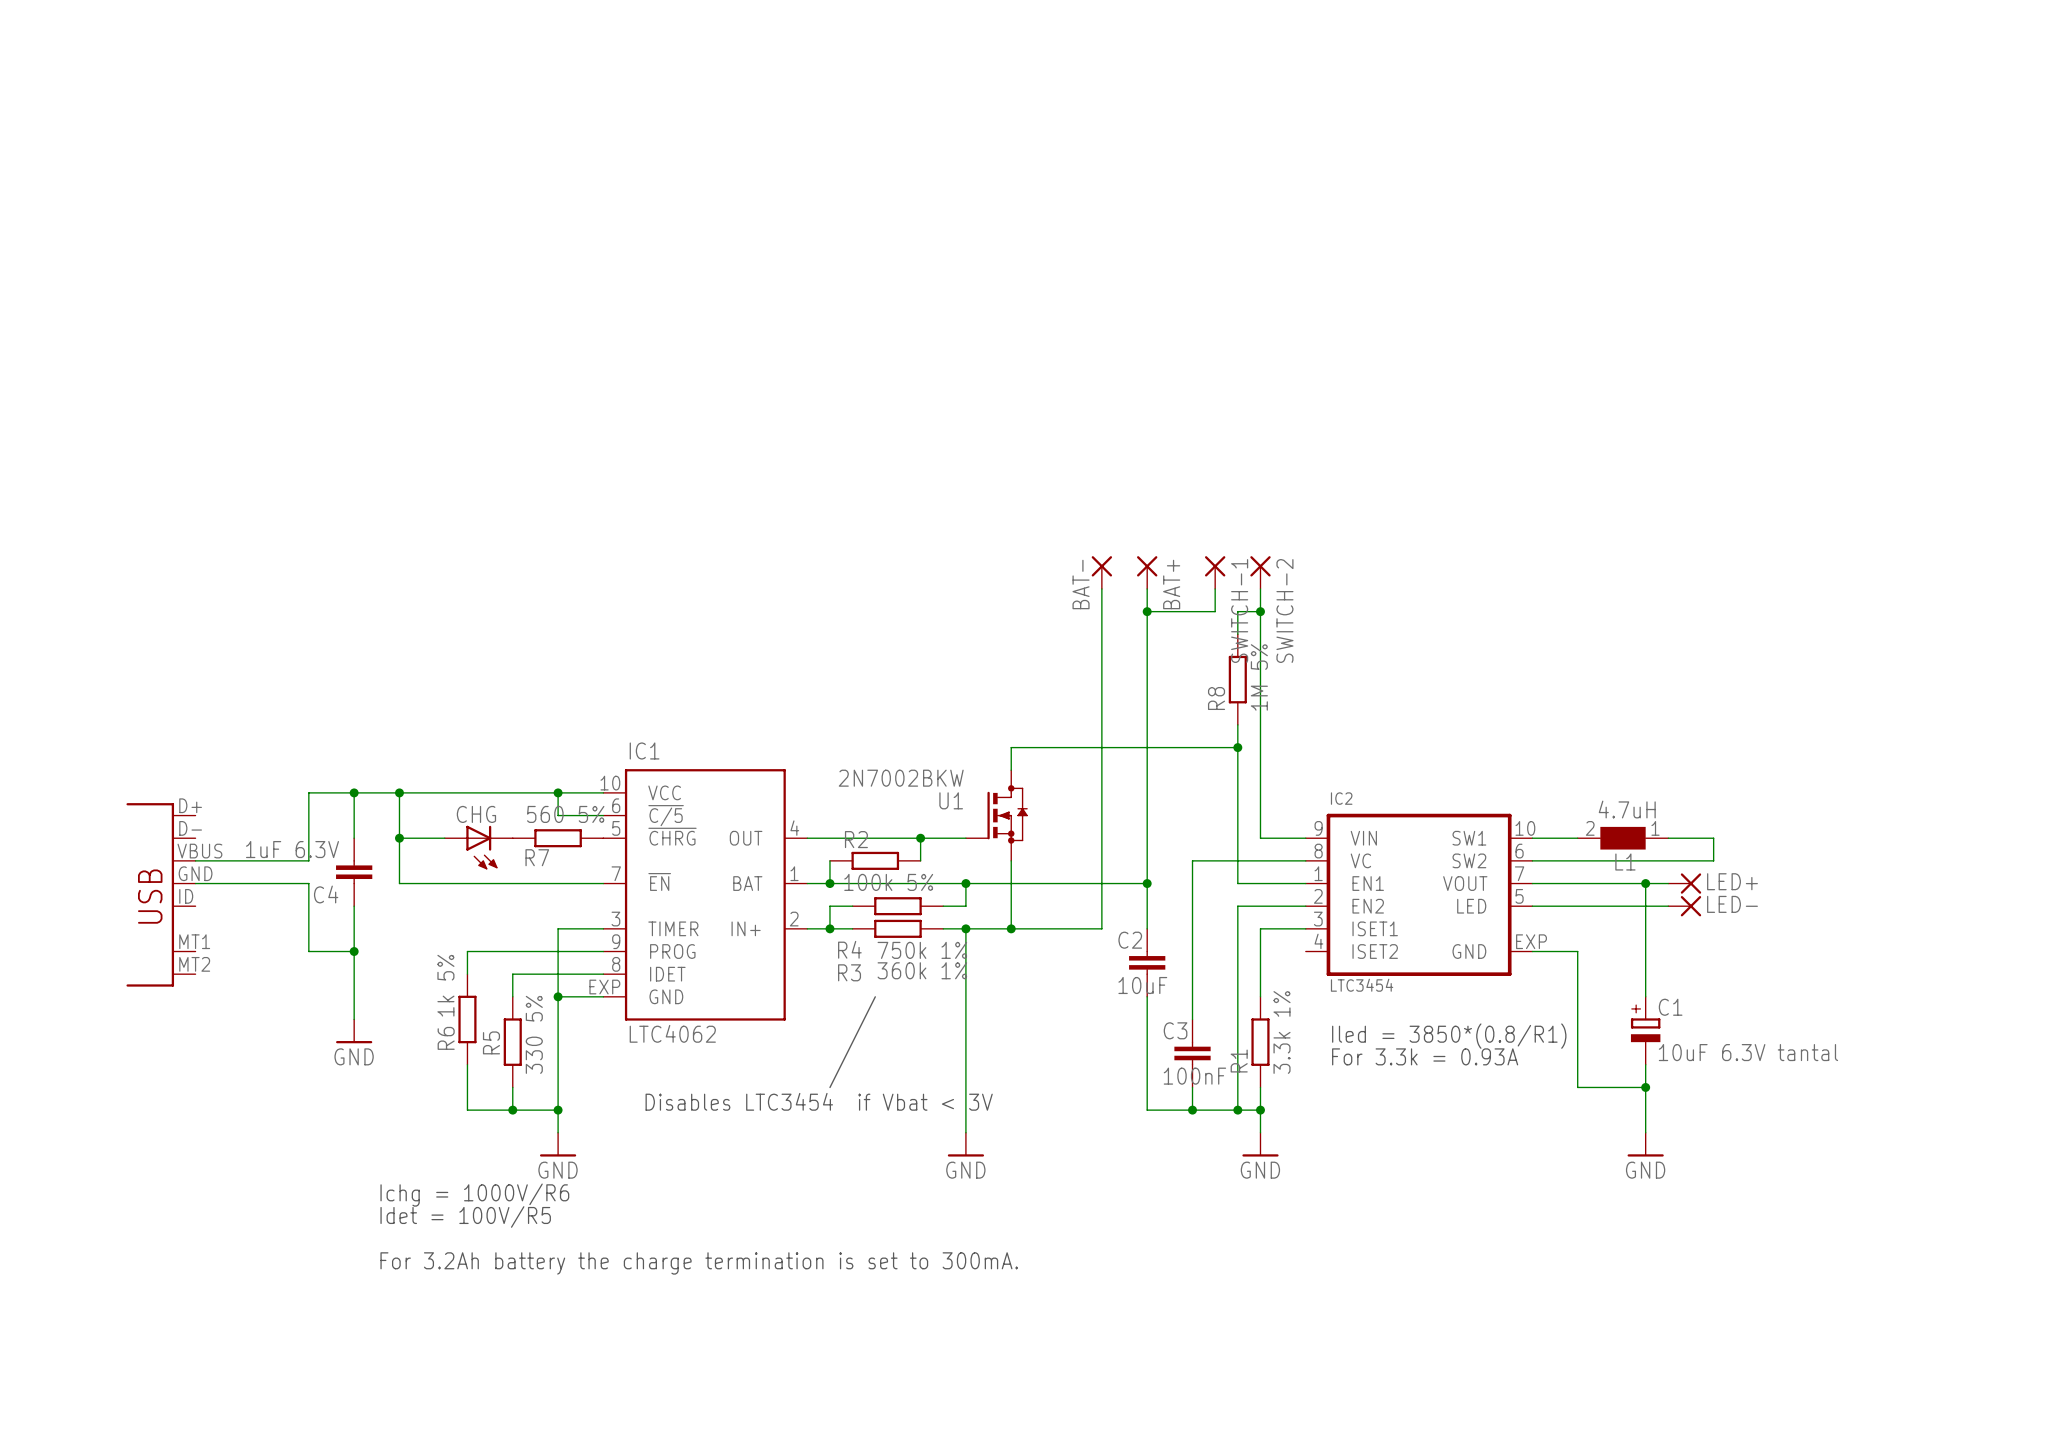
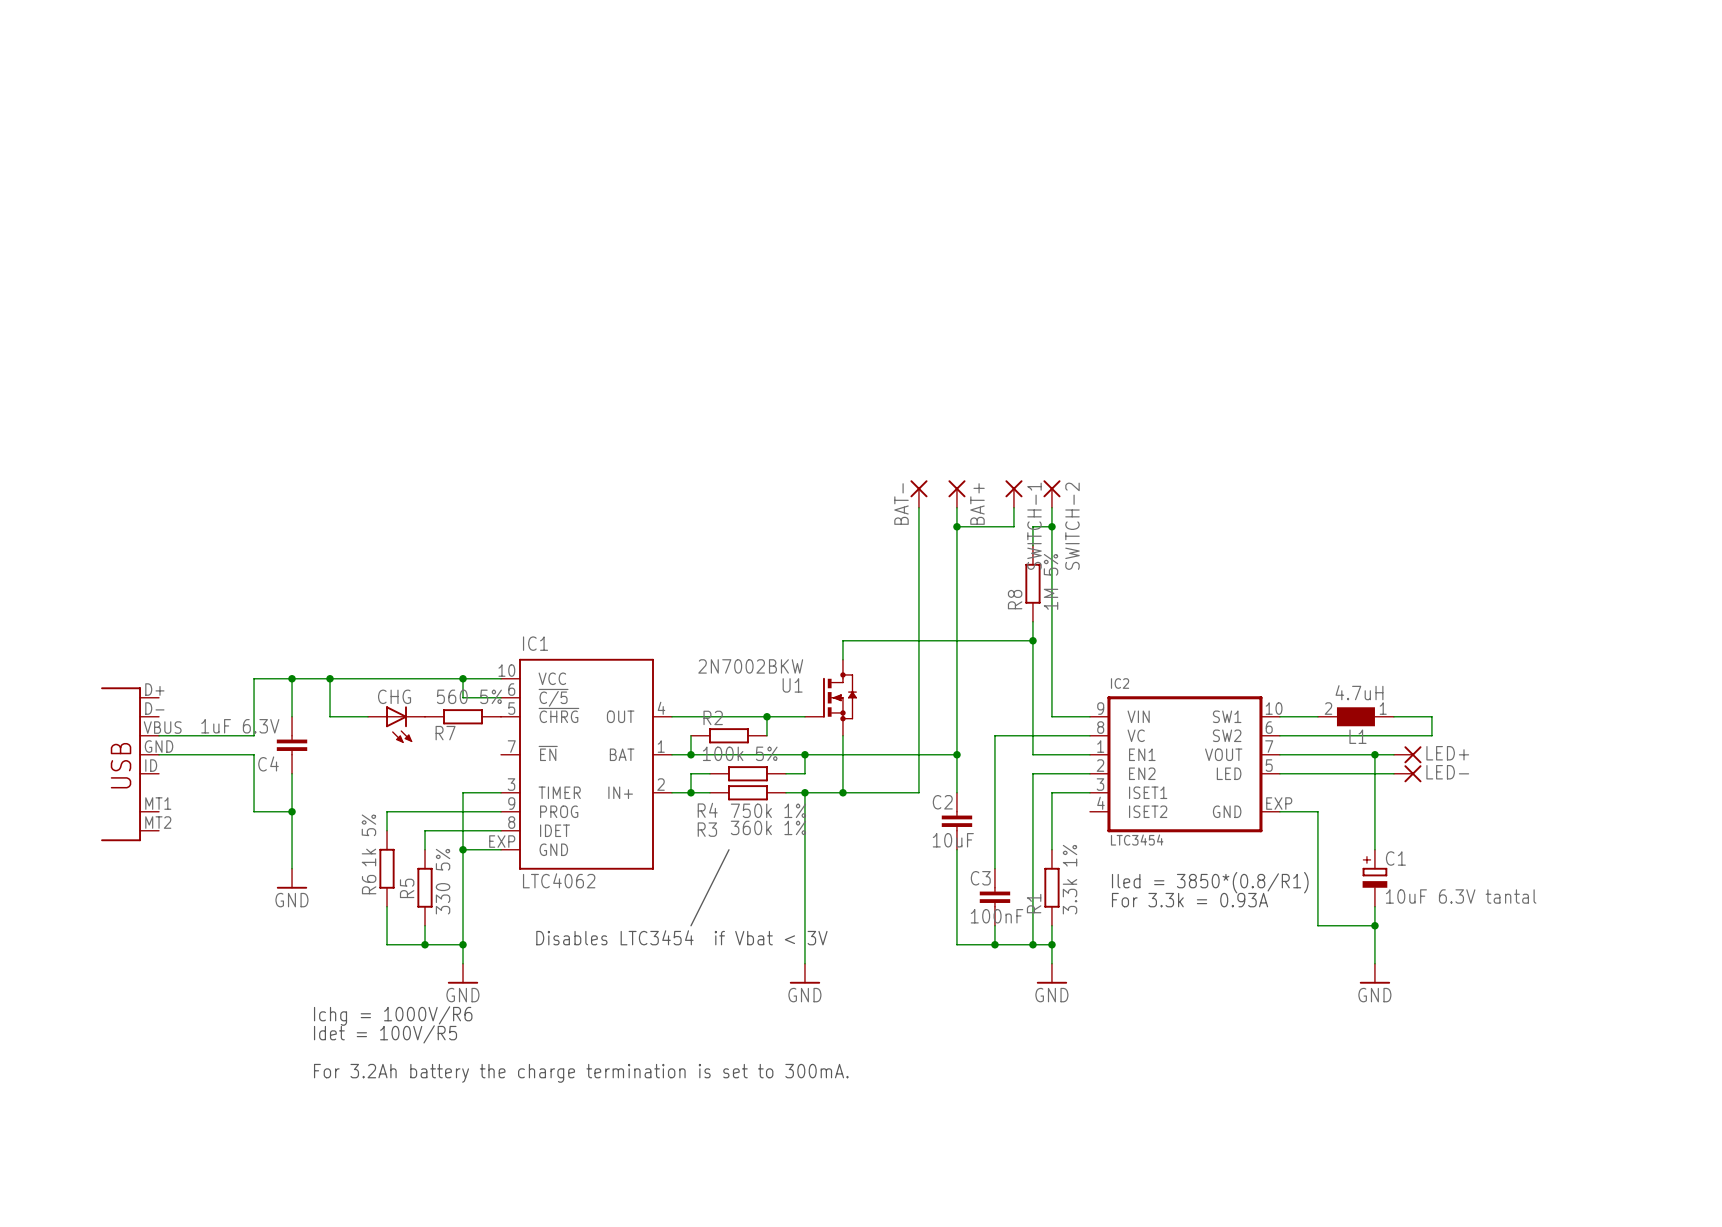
wire: (399, 838) (399, 883) (603, 883) -> none
junction: (399, 838) -> none

